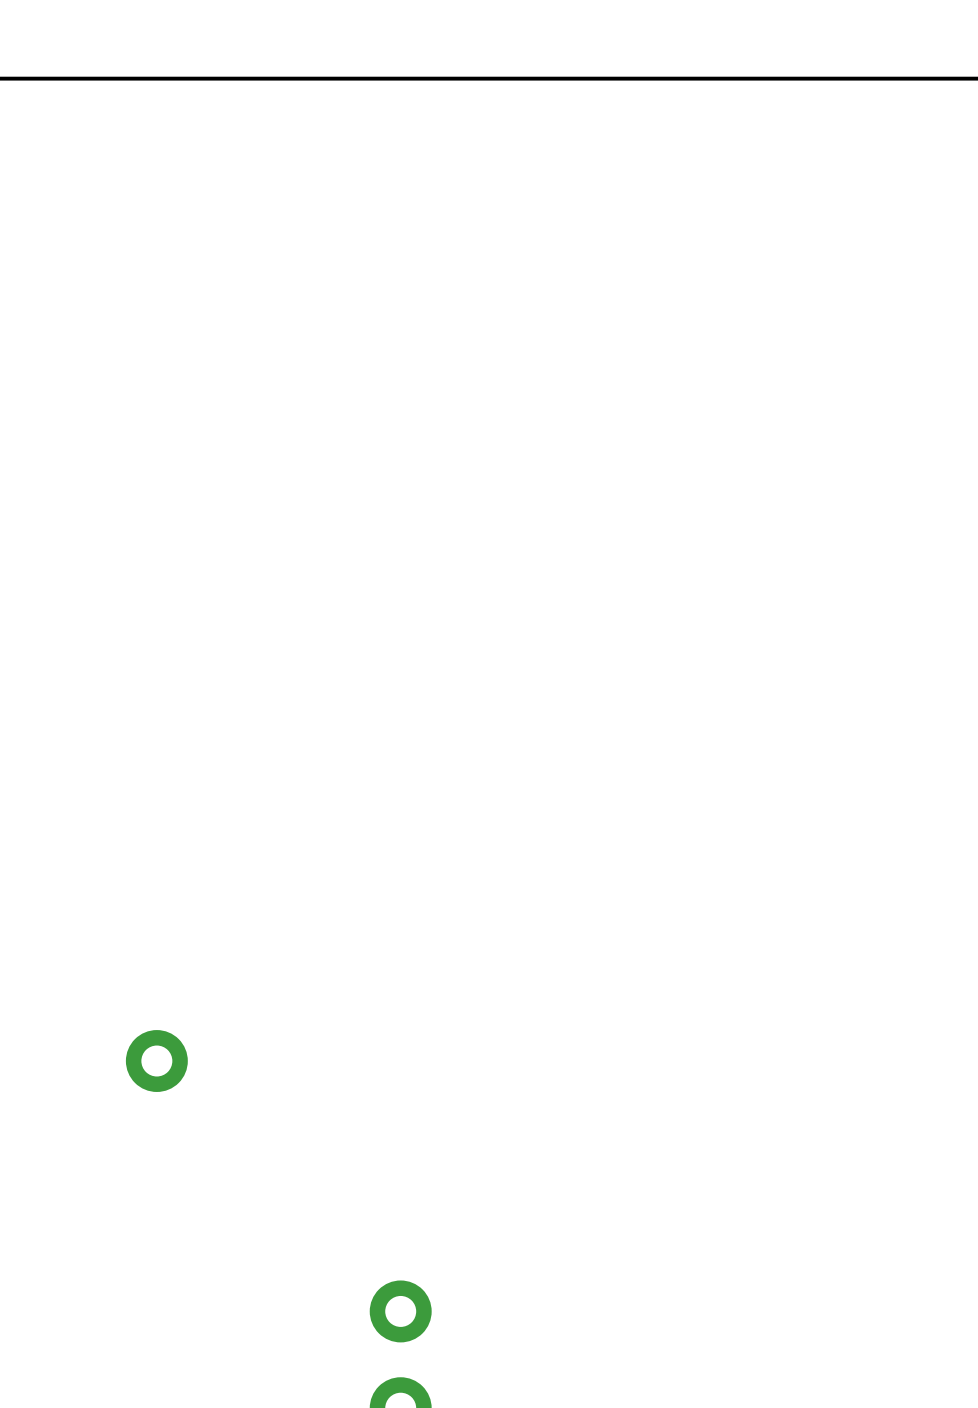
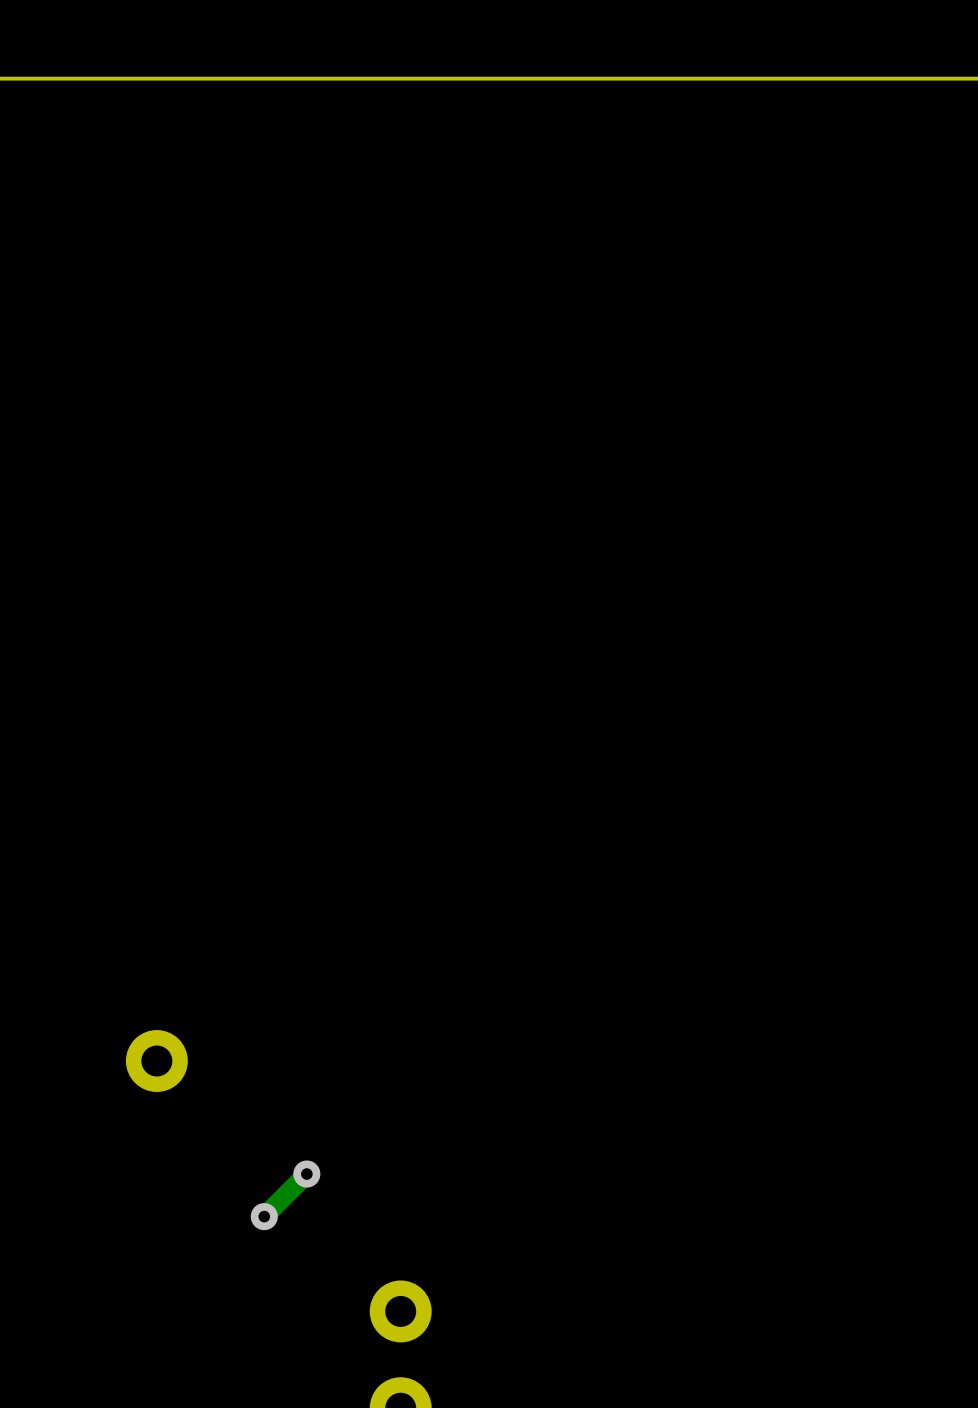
track: none -> (306, 1174) (264, 1216)
via: none -> (306, 1174)
via: none -> (264, 1216)

